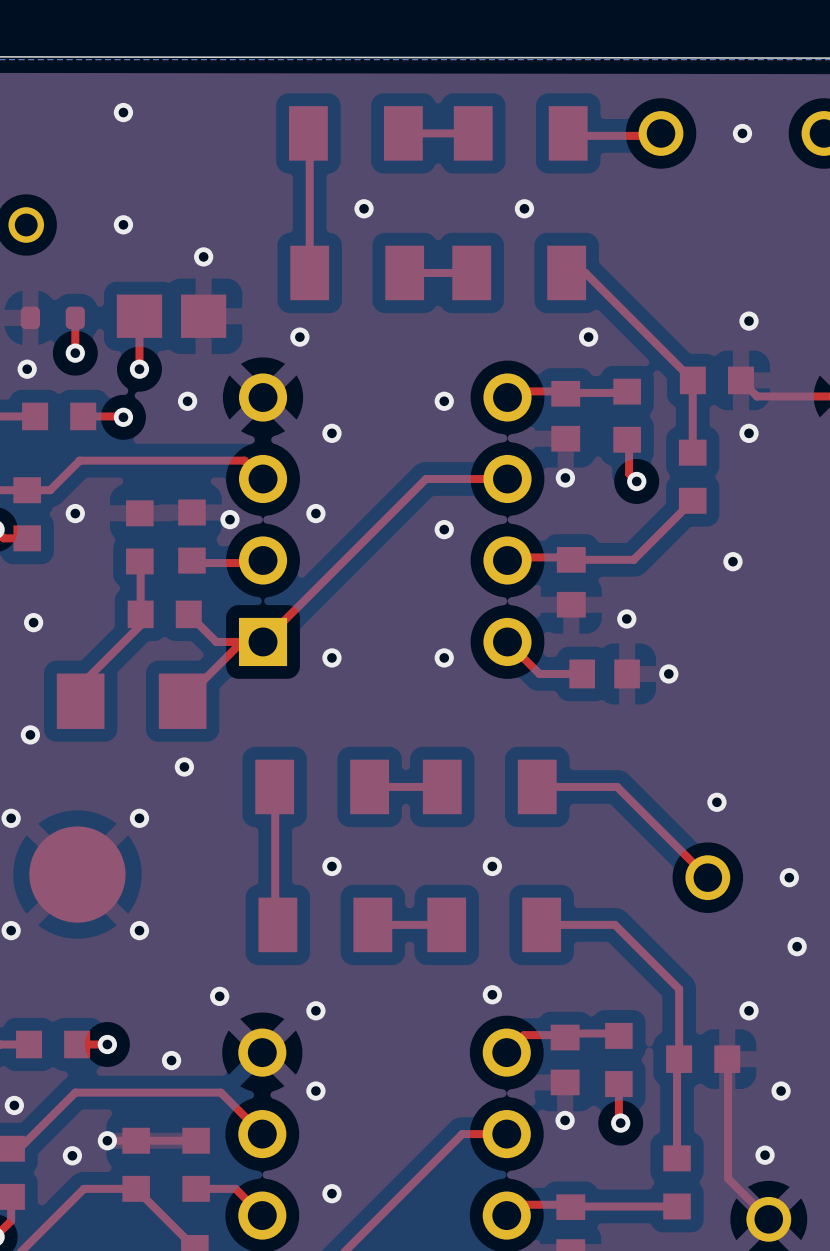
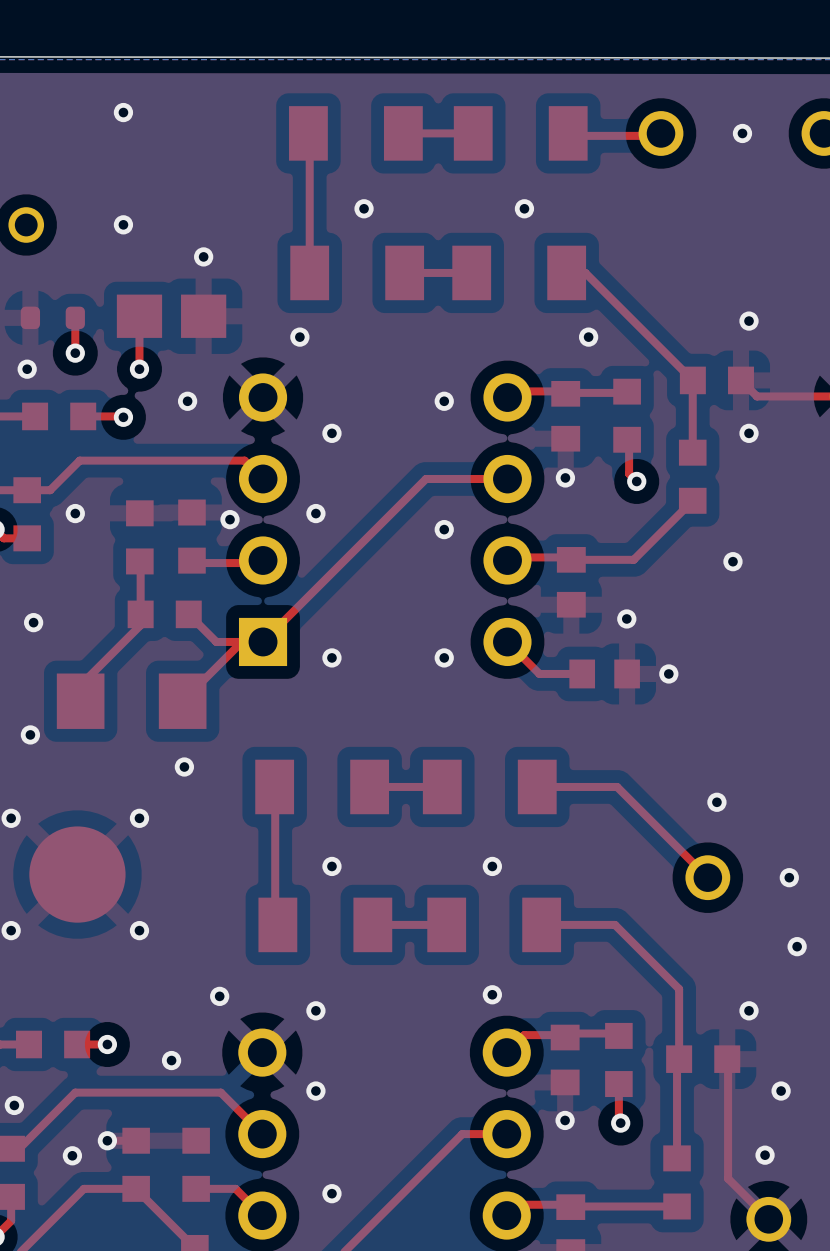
top track: (196, 1140) (136, 1140) -> none

